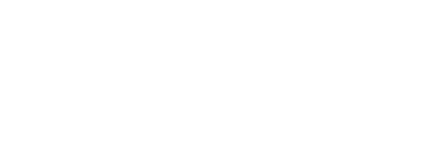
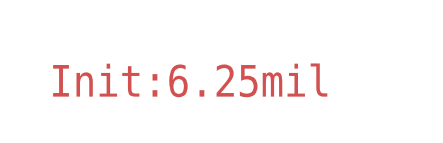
text: none -> Init:6.25mil (190, 80)

